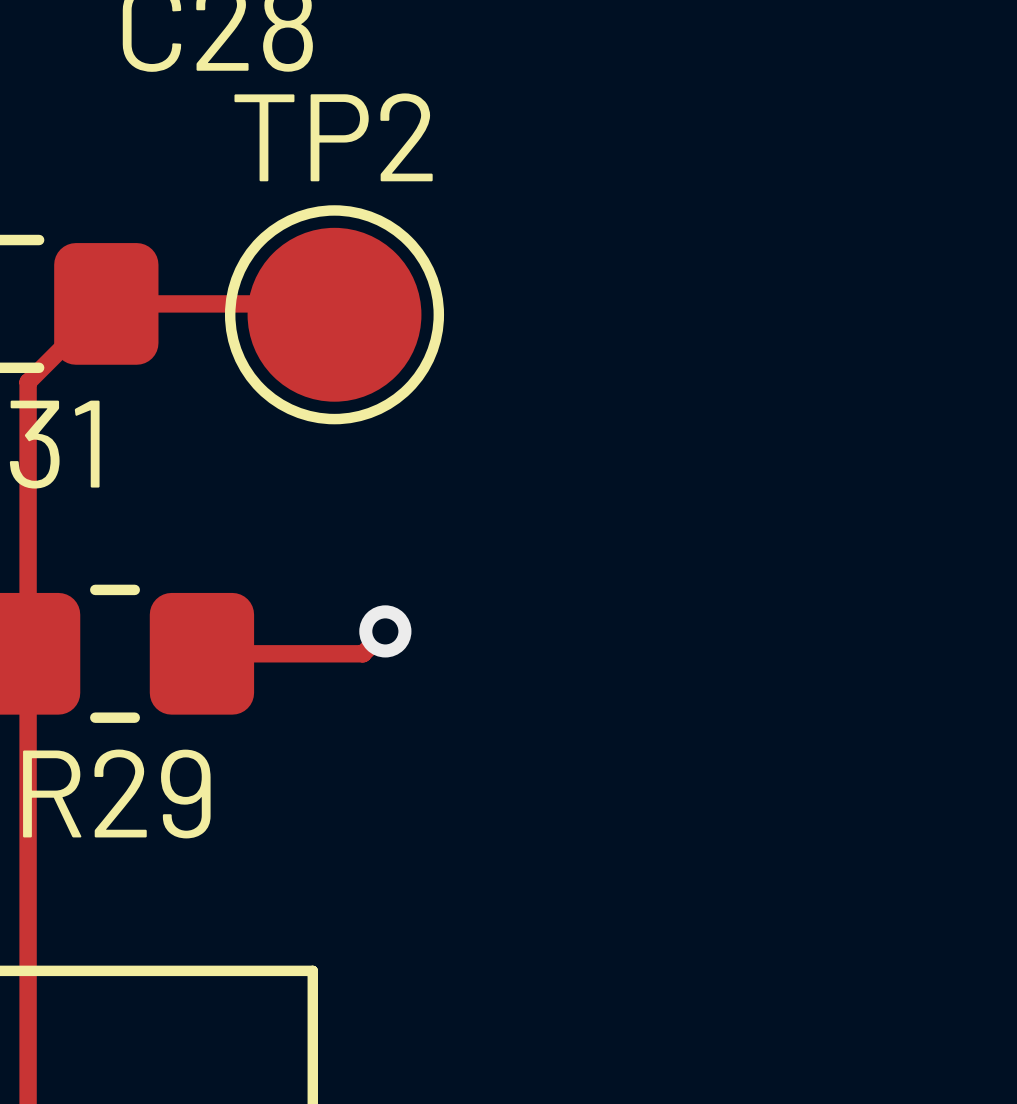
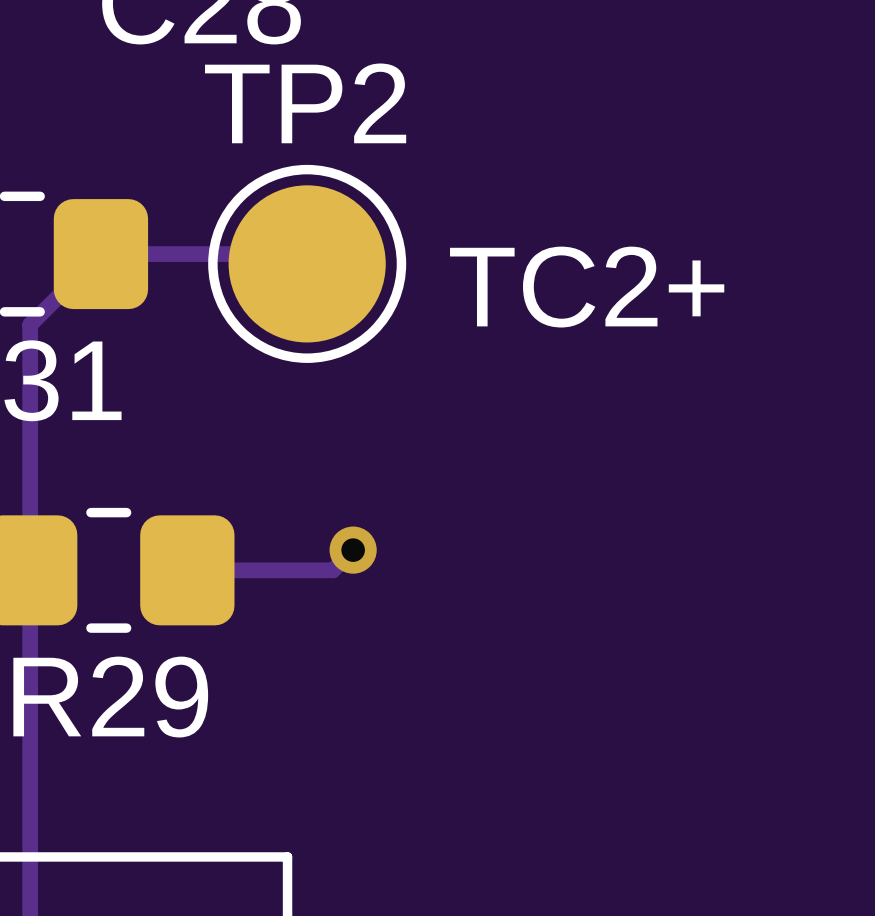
text: none -> TC2+ (587, 287)

